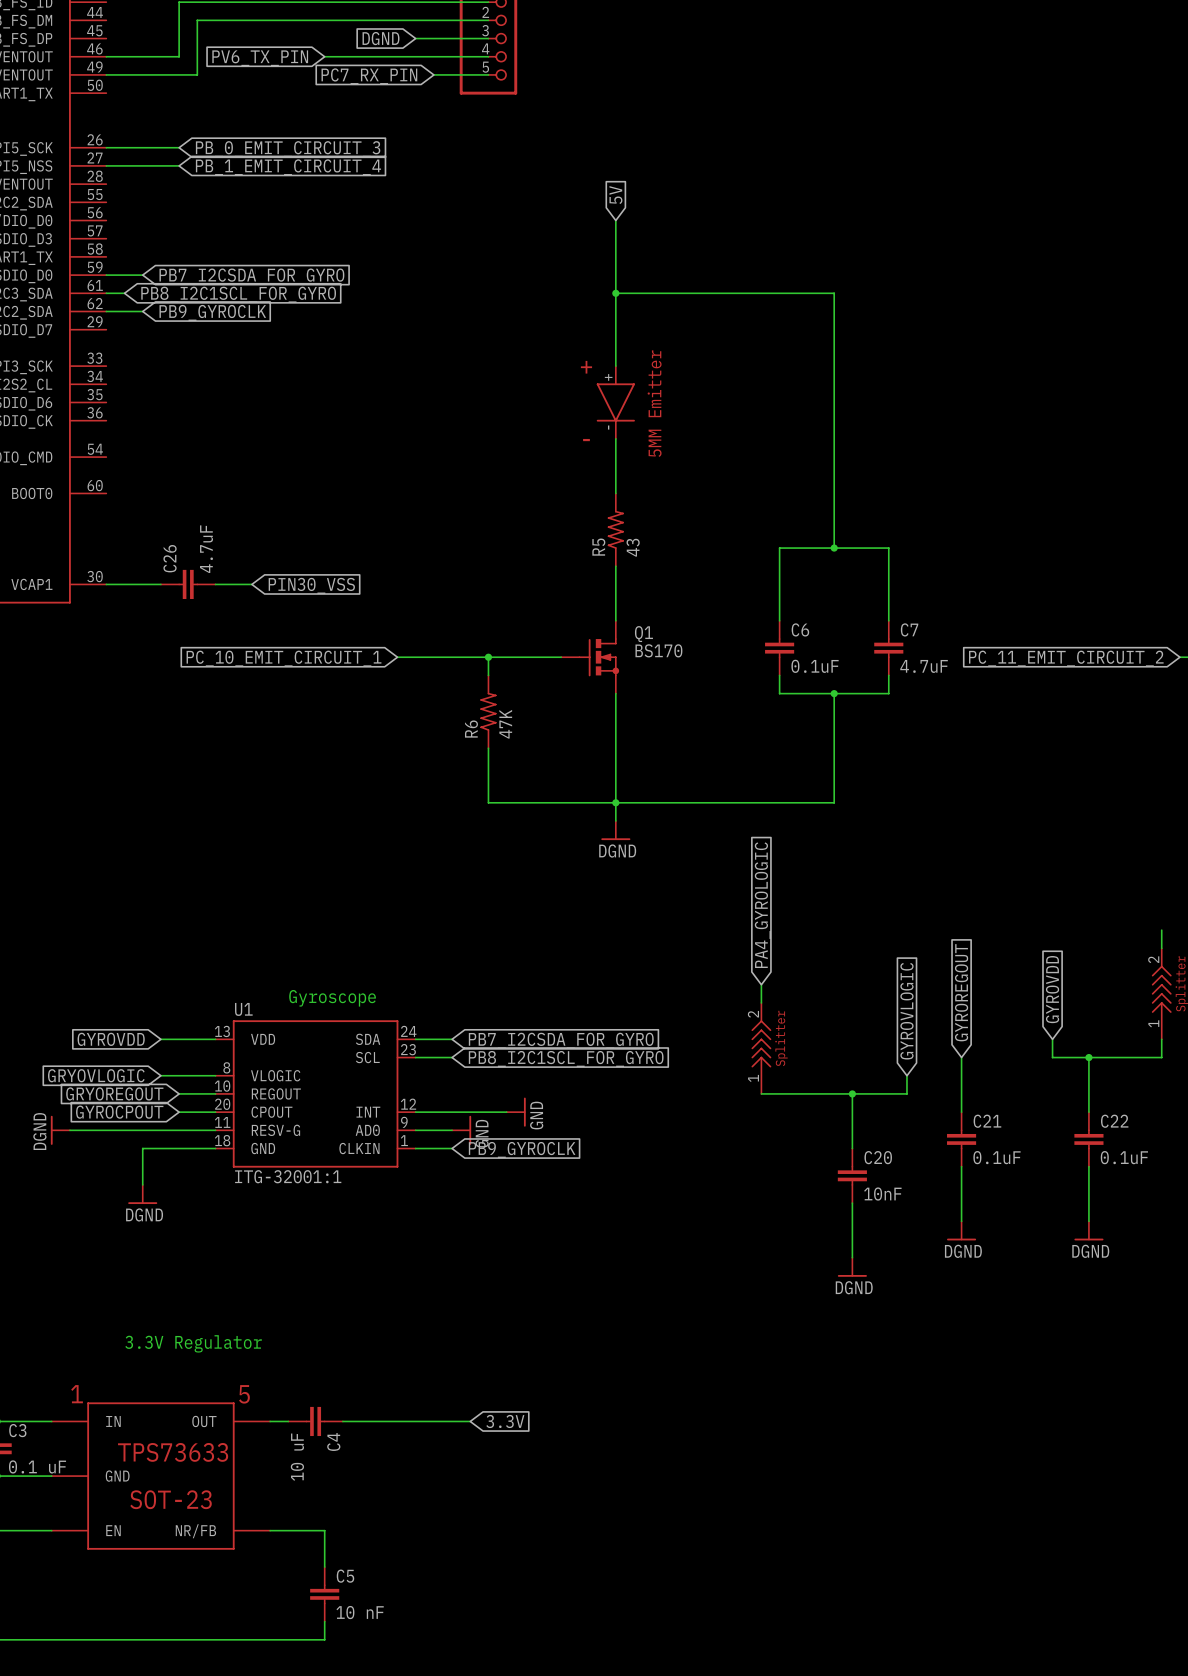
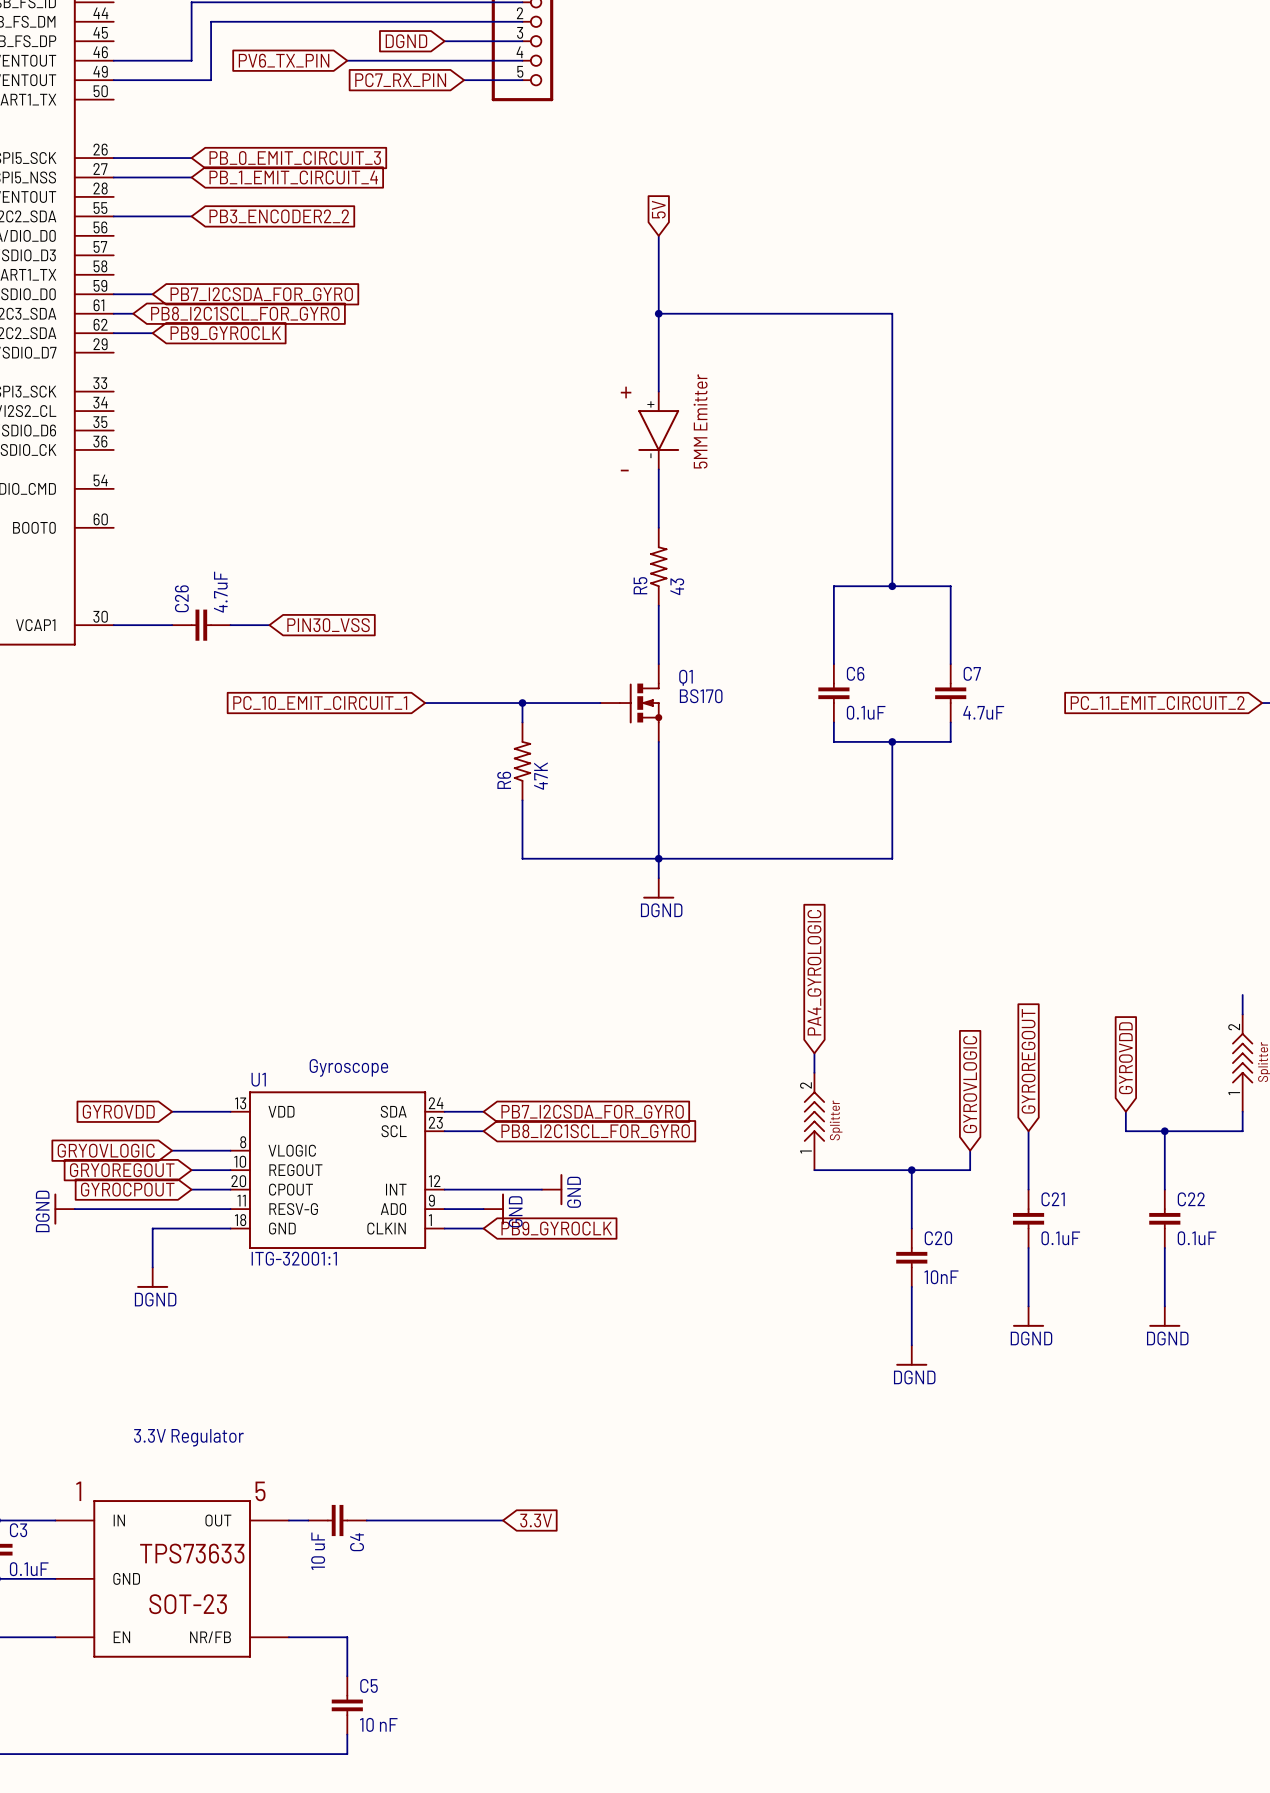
wire: none -> (113, 216) (191, 216)
global label: none -> PB3_ENCODER2_2 (279, 216)
C3 value: 0.1 uF (37, 1466) -> 0.1uF (29, 1569)

